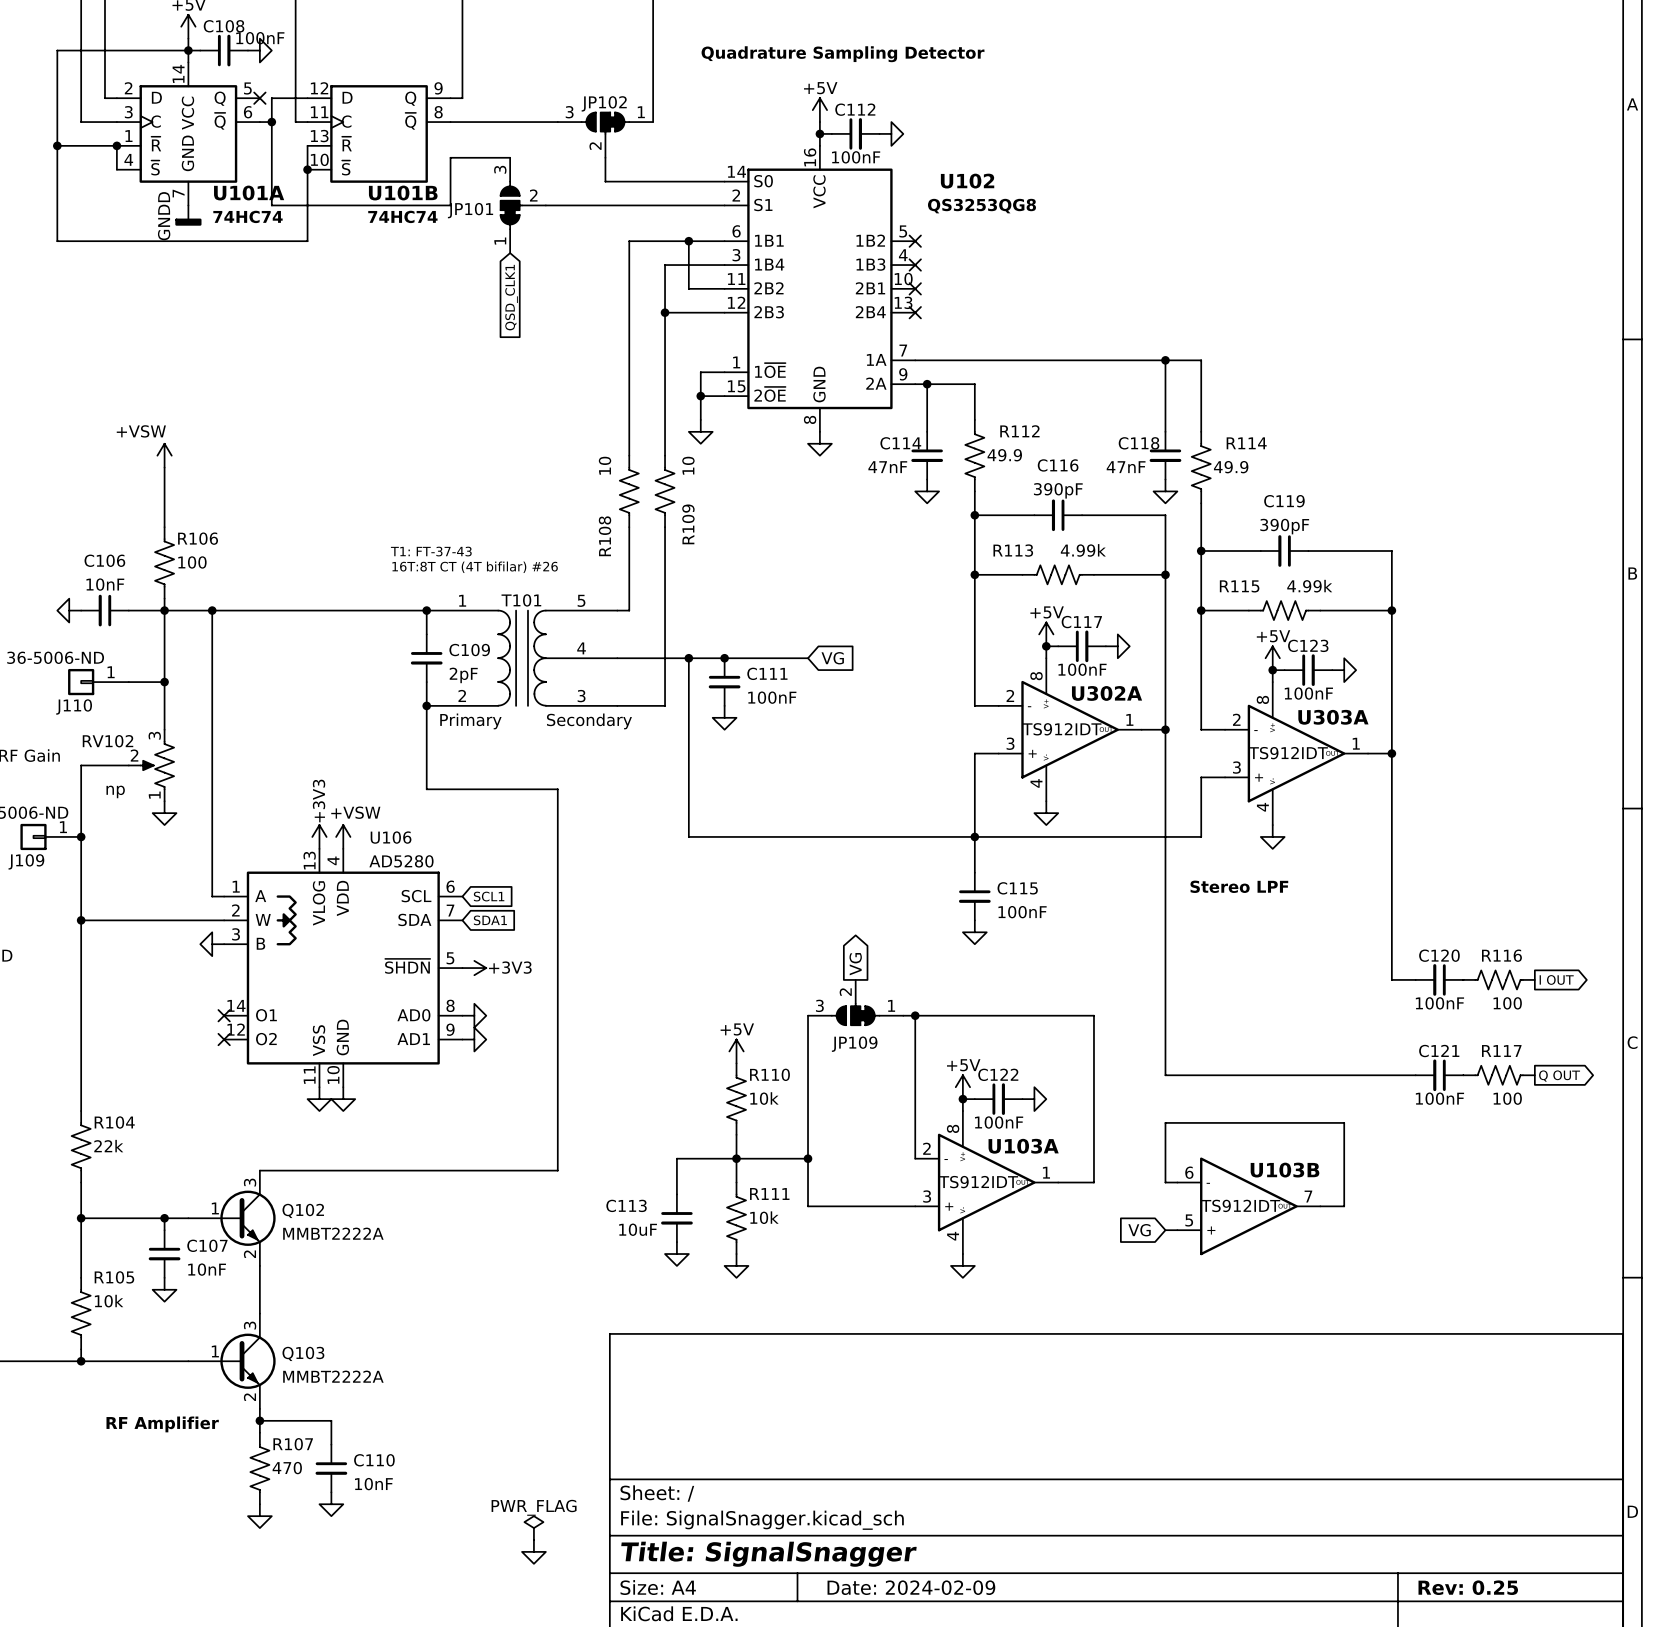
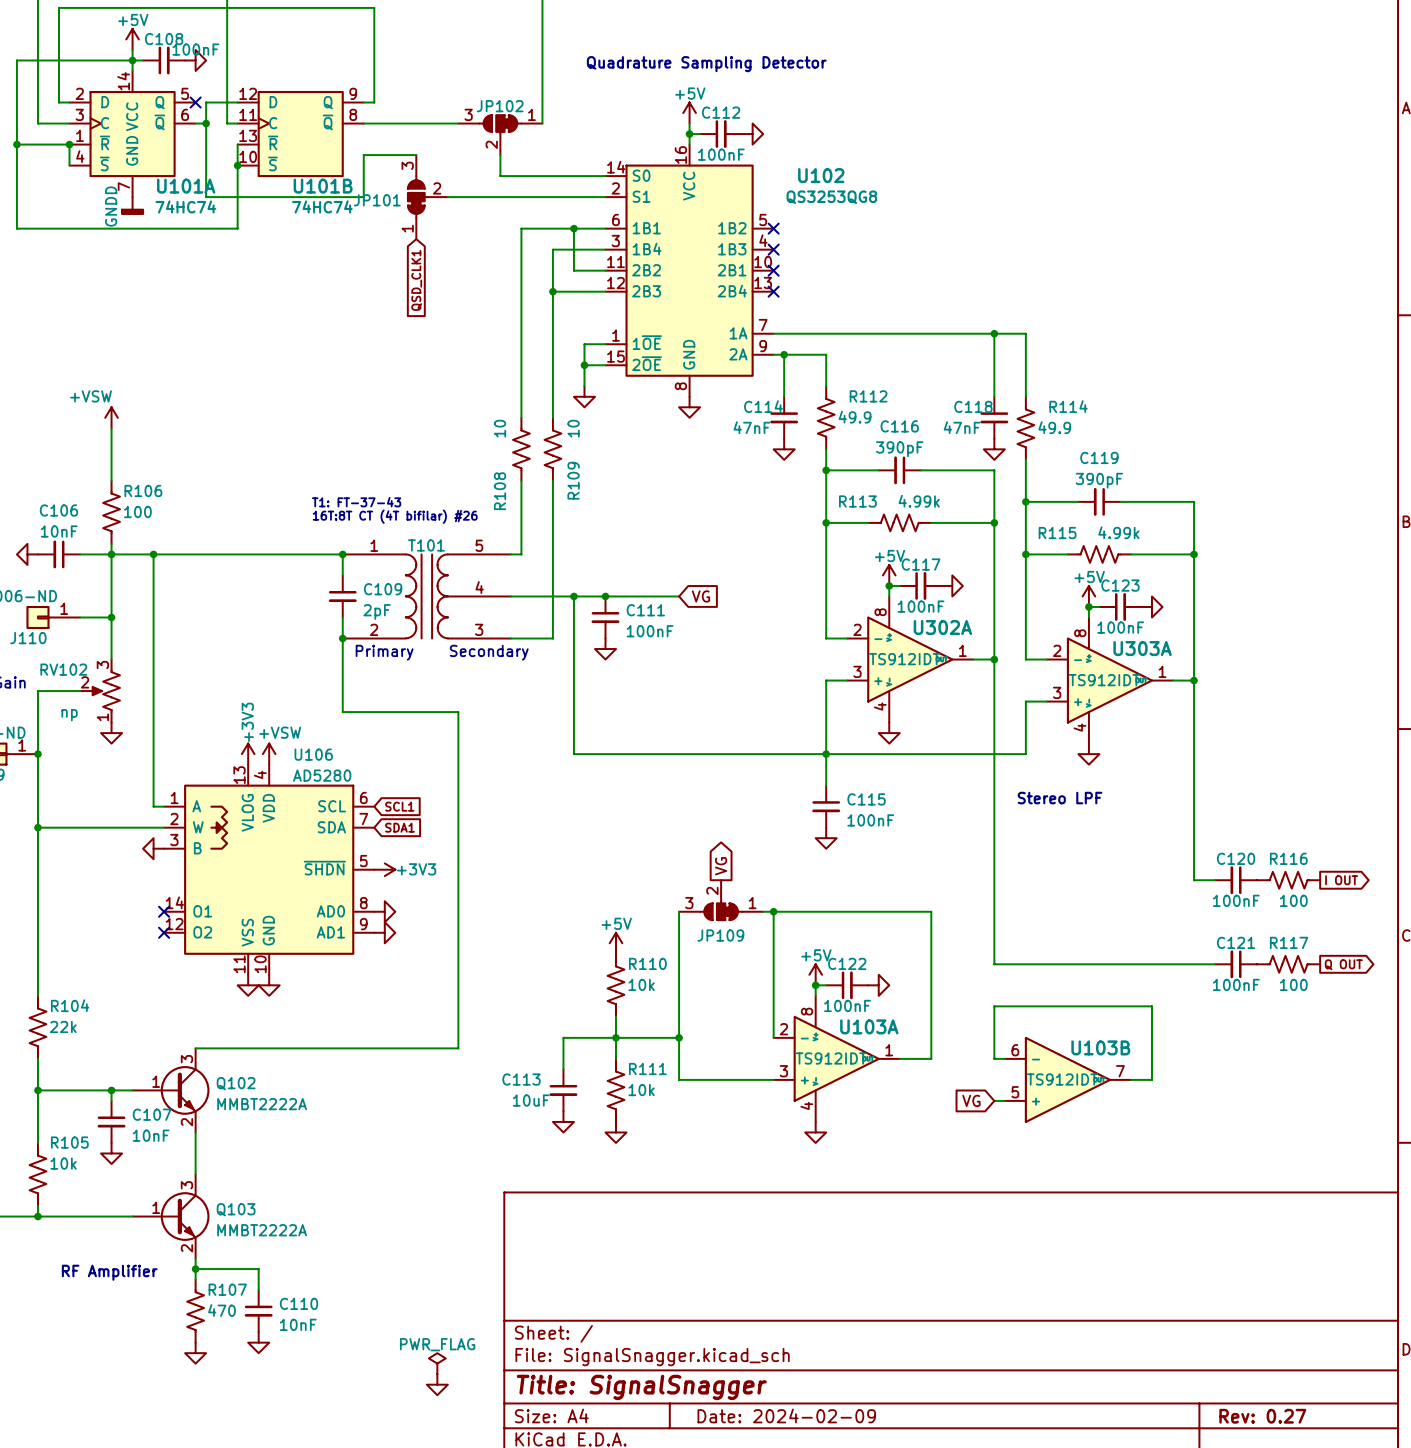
title block: Rev: 0.25 (1468, 1587) -> Rev: 0.27 (1262, 1416)

